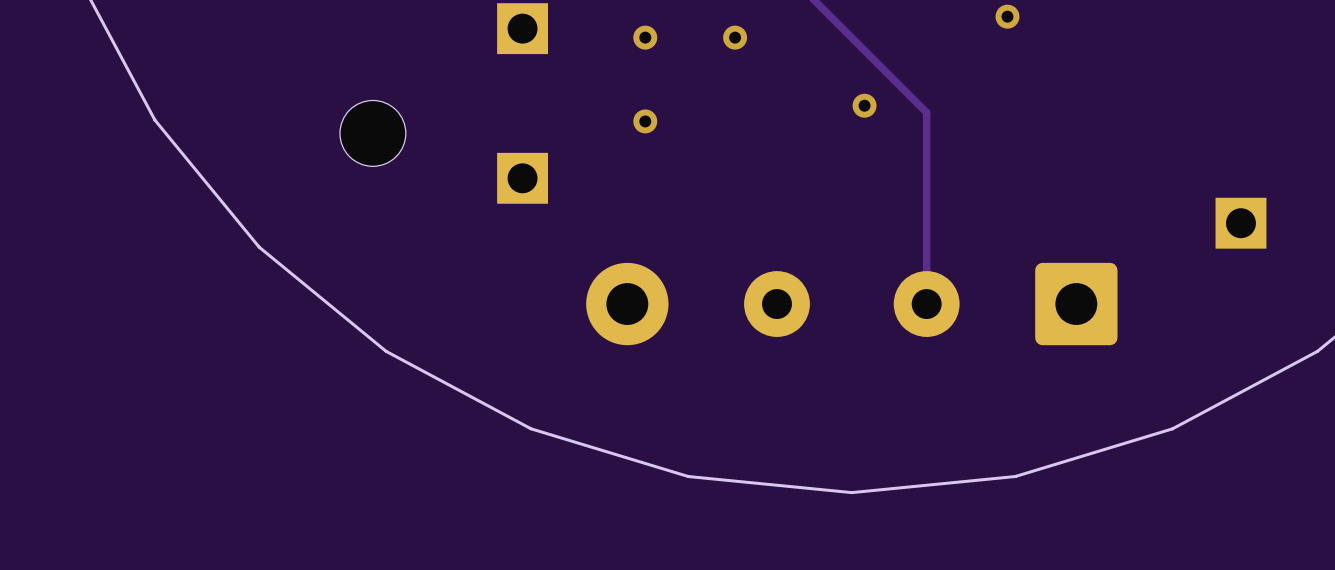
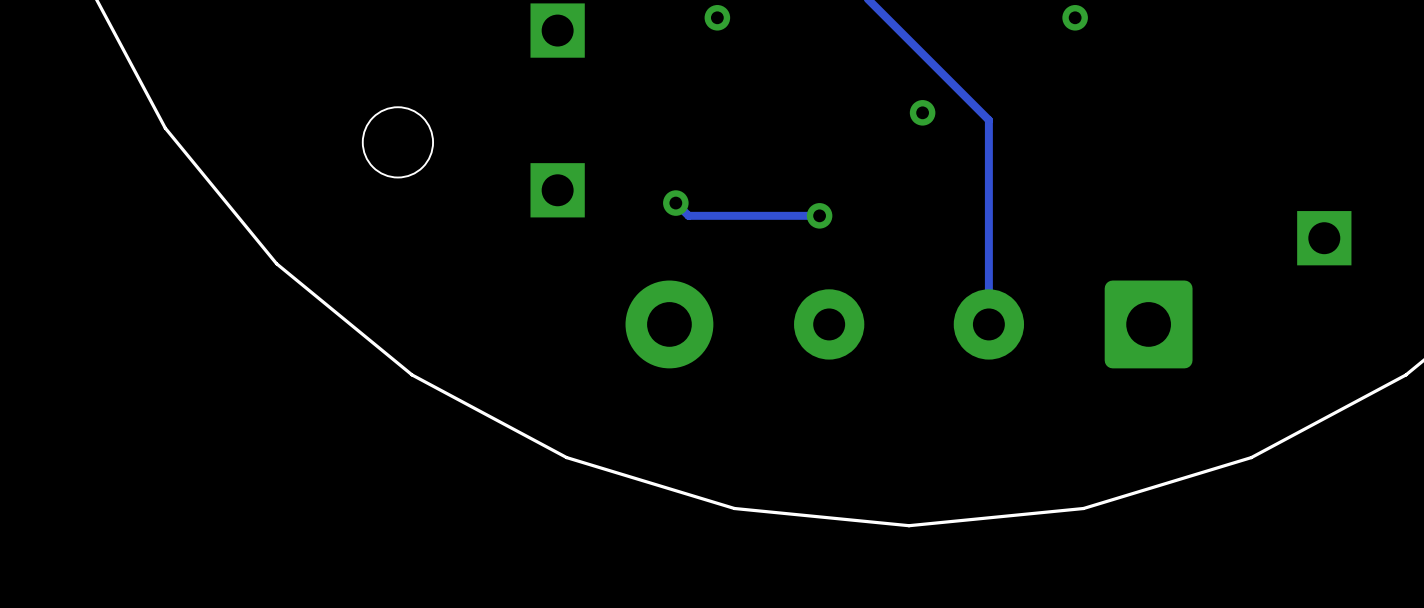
via: none -> (717, 17)
via: (645, 37) -> none
via: (735, 37) -> none
via: (645, 121) -> none
track: none -> (675, 203) (688, 215) (819, 215)
via: none -> (675, 203)
via: none -> (819, 215)

